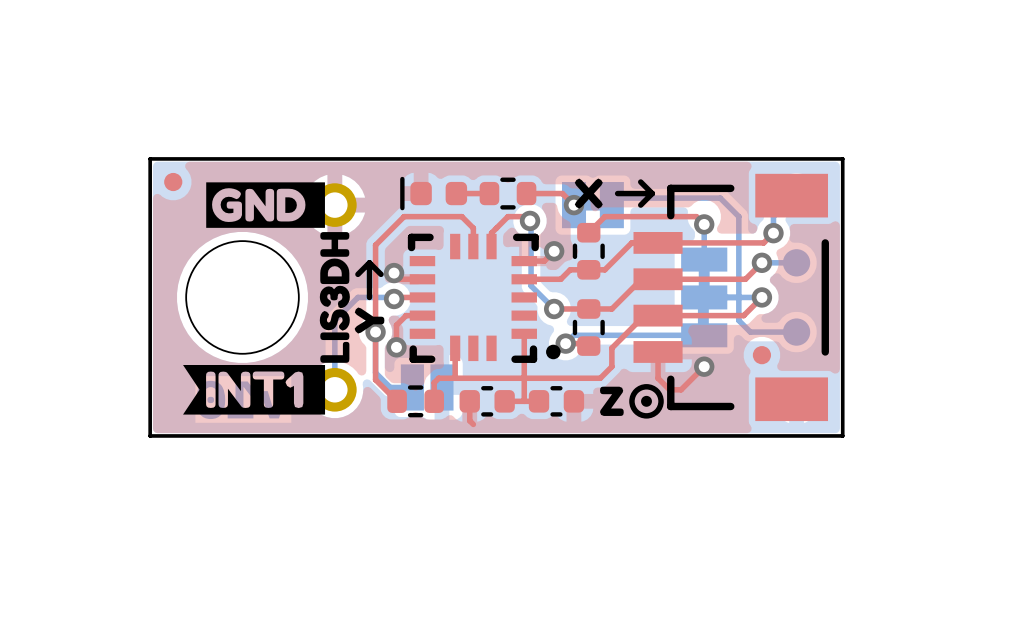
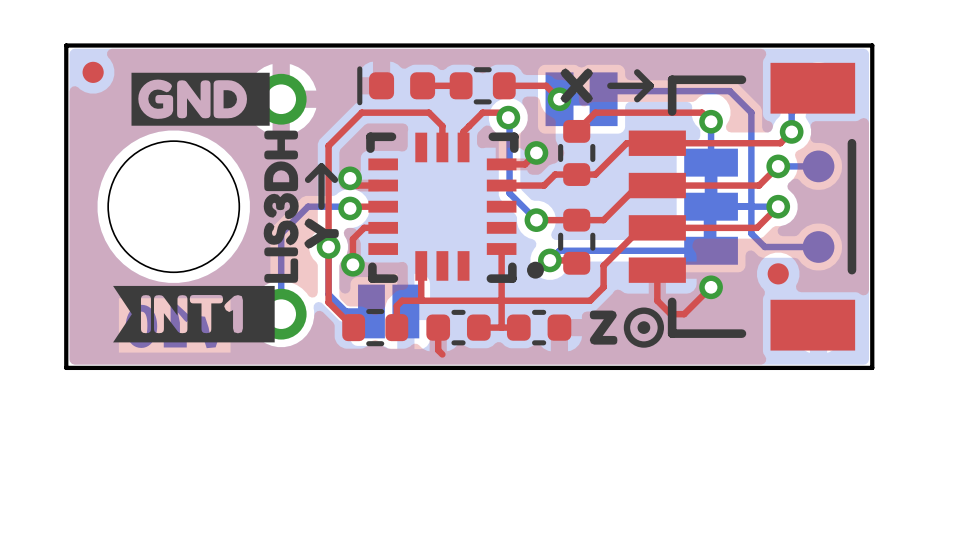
drawing shape: [183, 365, 326, 415] -> [113, 285, 275, 343]

